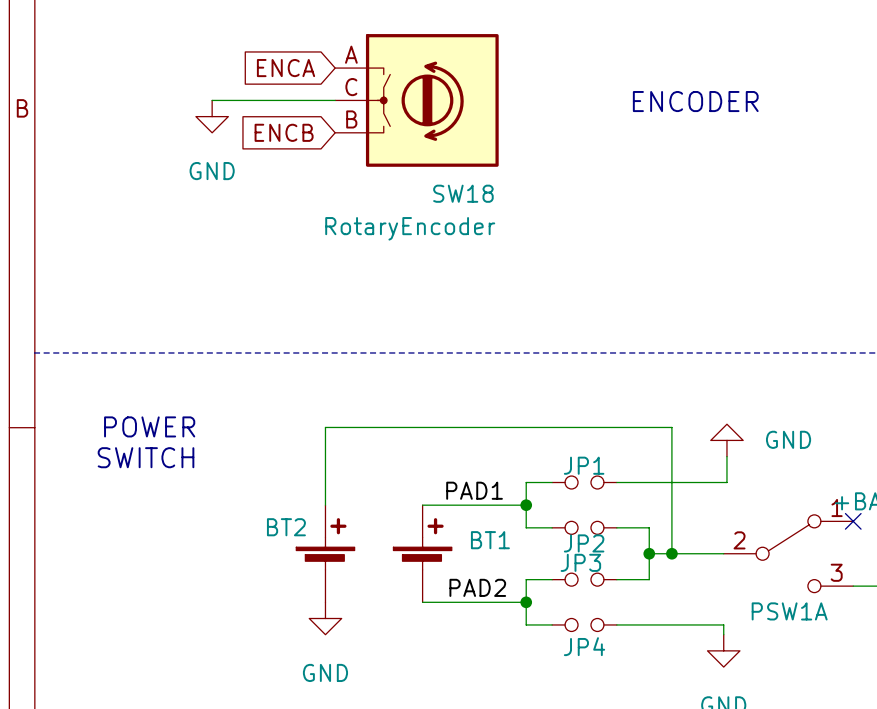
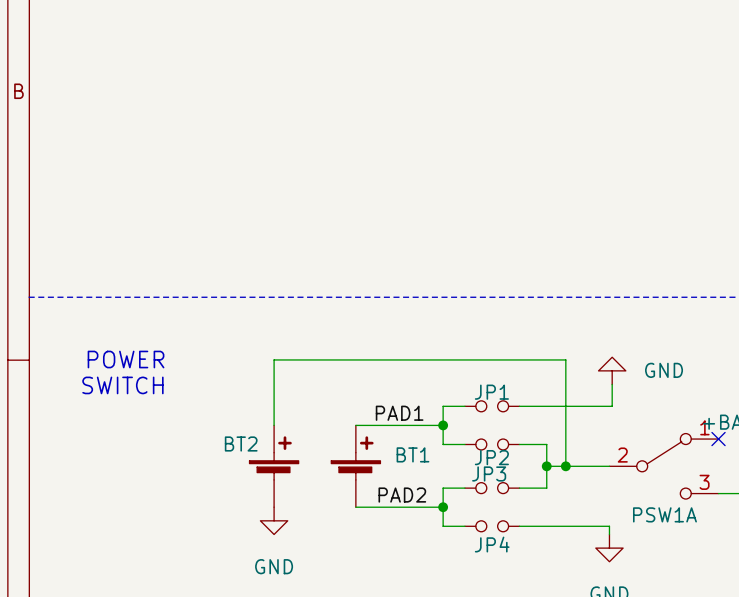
global label: ENCA (286, 68) -> none
wire: (212, 100) (335, 100) -> none
SW18: RotaryEncoder (416, 100) -> none
text: ENCODER (695, 101) -> none
power symbol: GND (212, 116) -> none
global label: ENCB (284, 132) -> none

